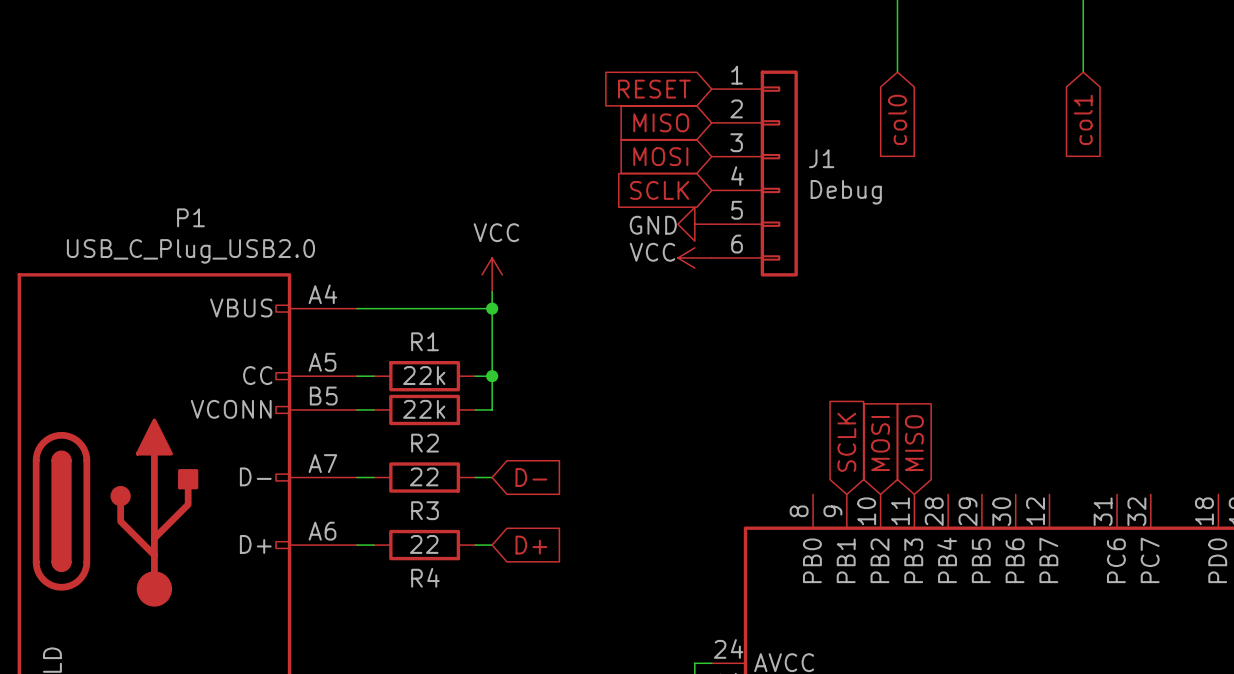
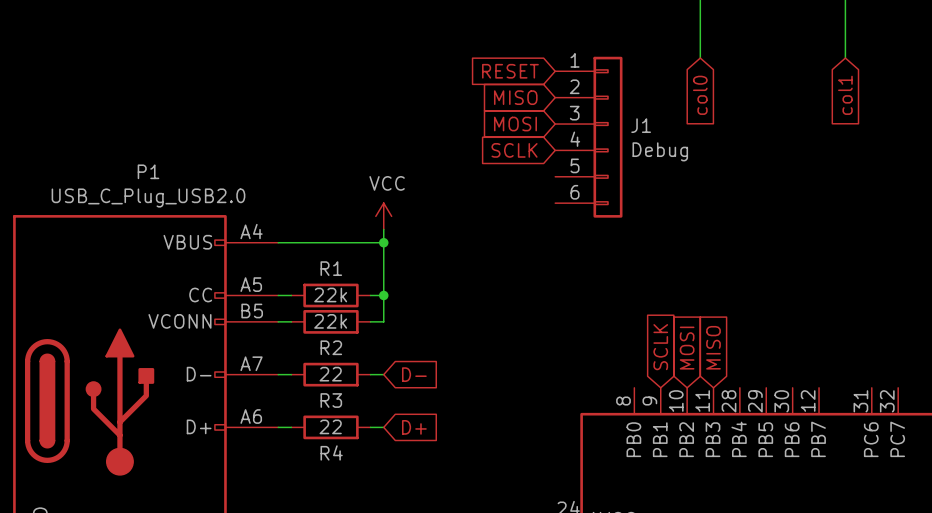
power symbol: GND (694, 224) -> none
power symbol: VCC (694, 257) -> none

